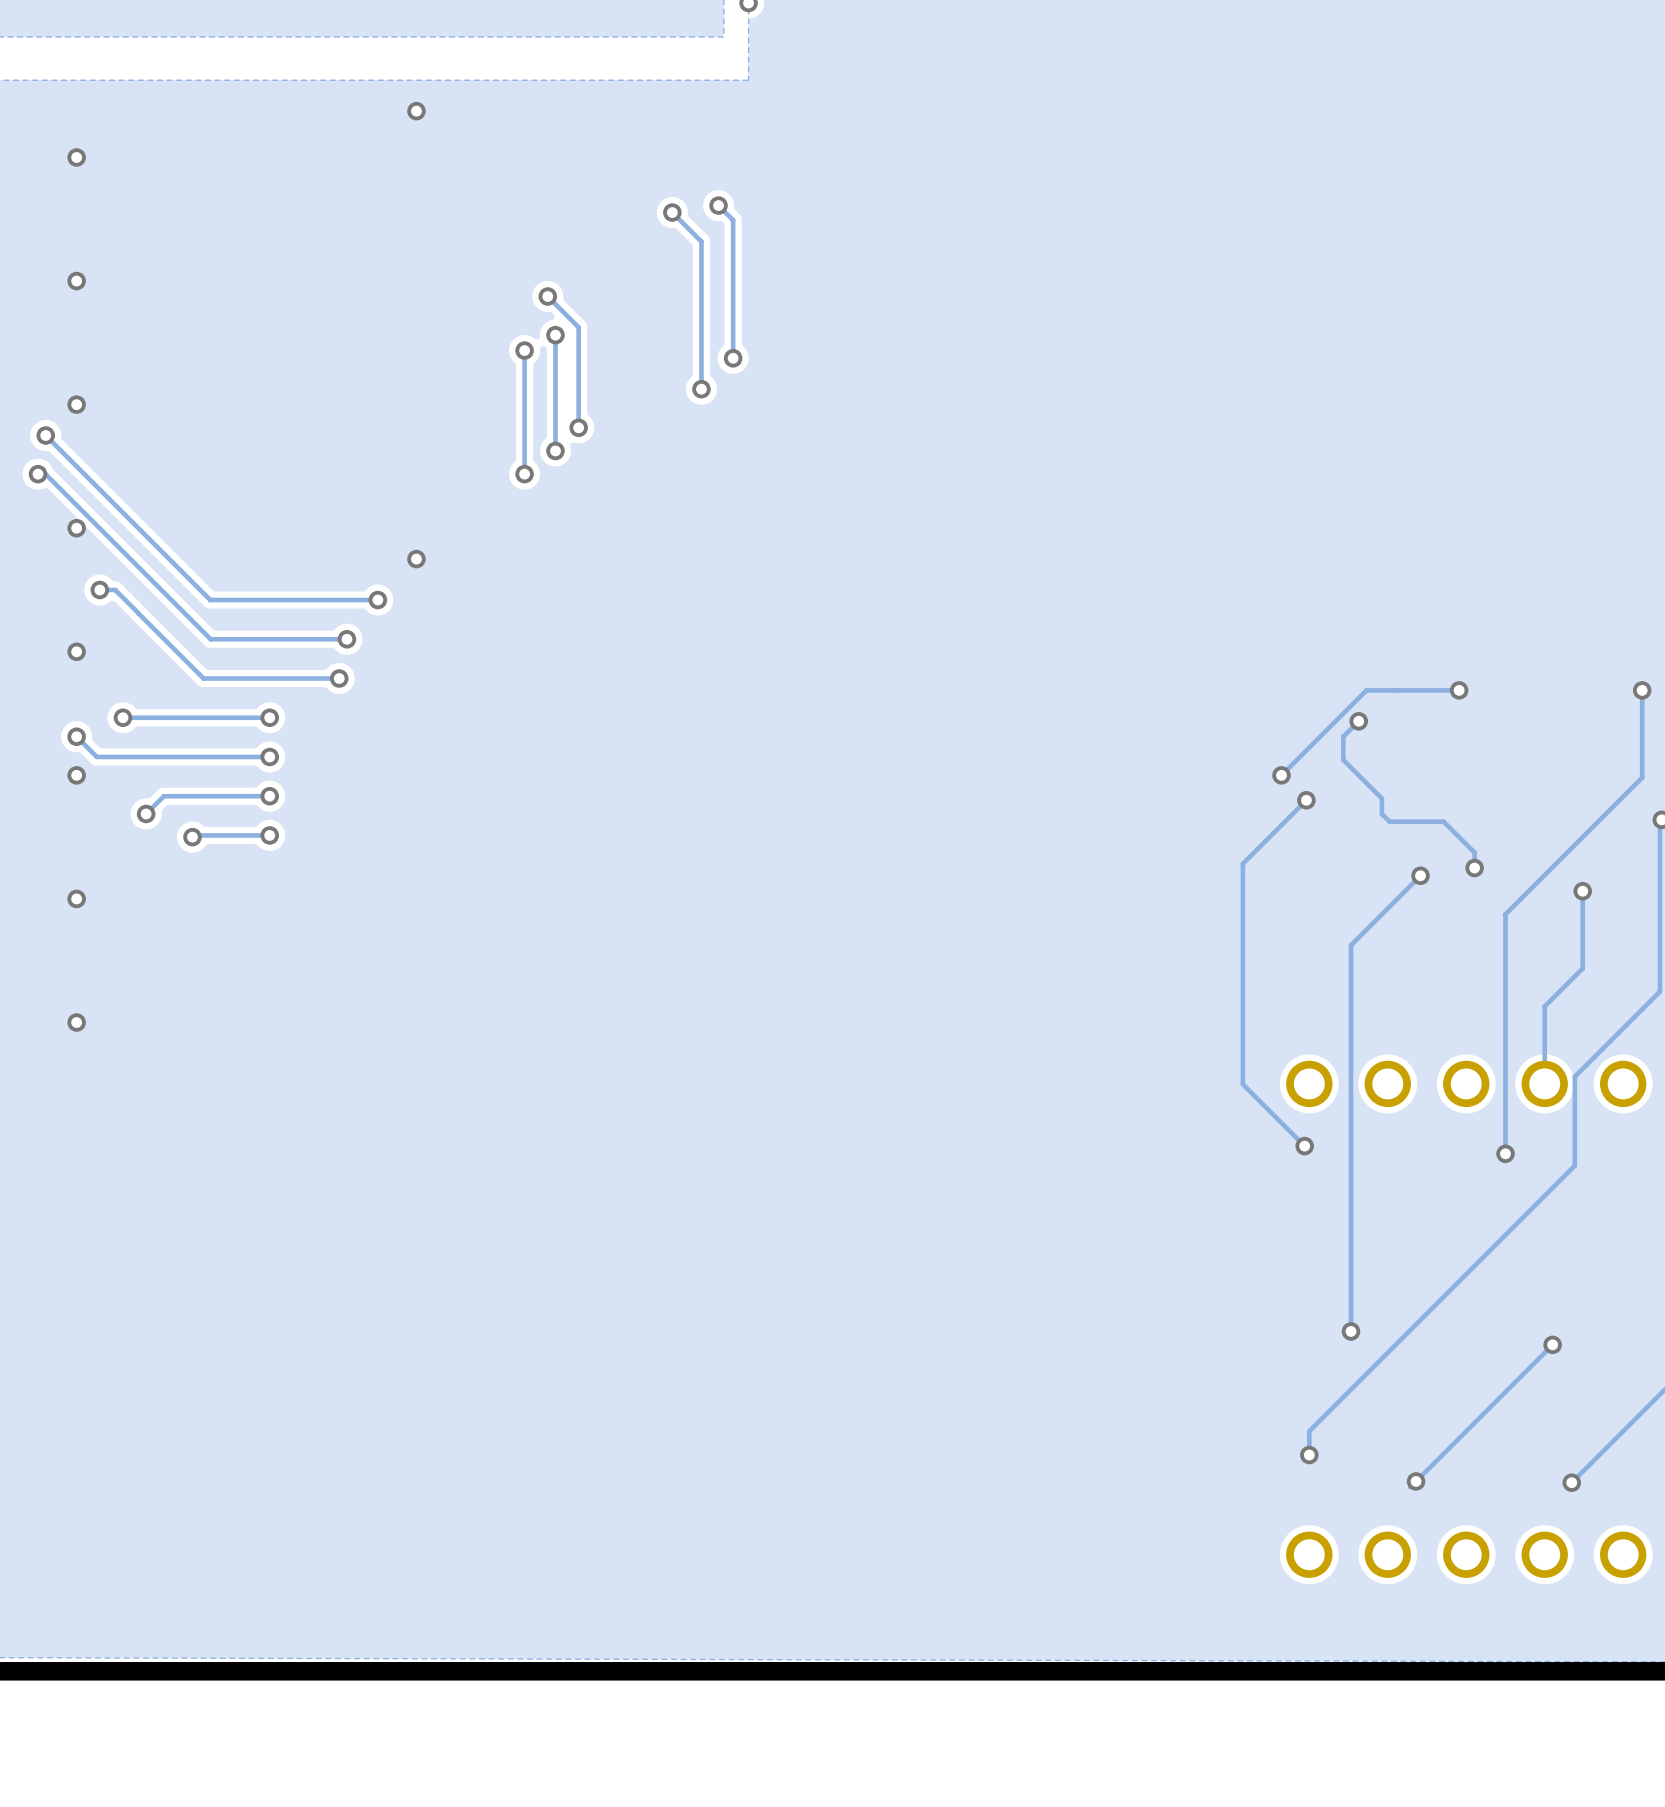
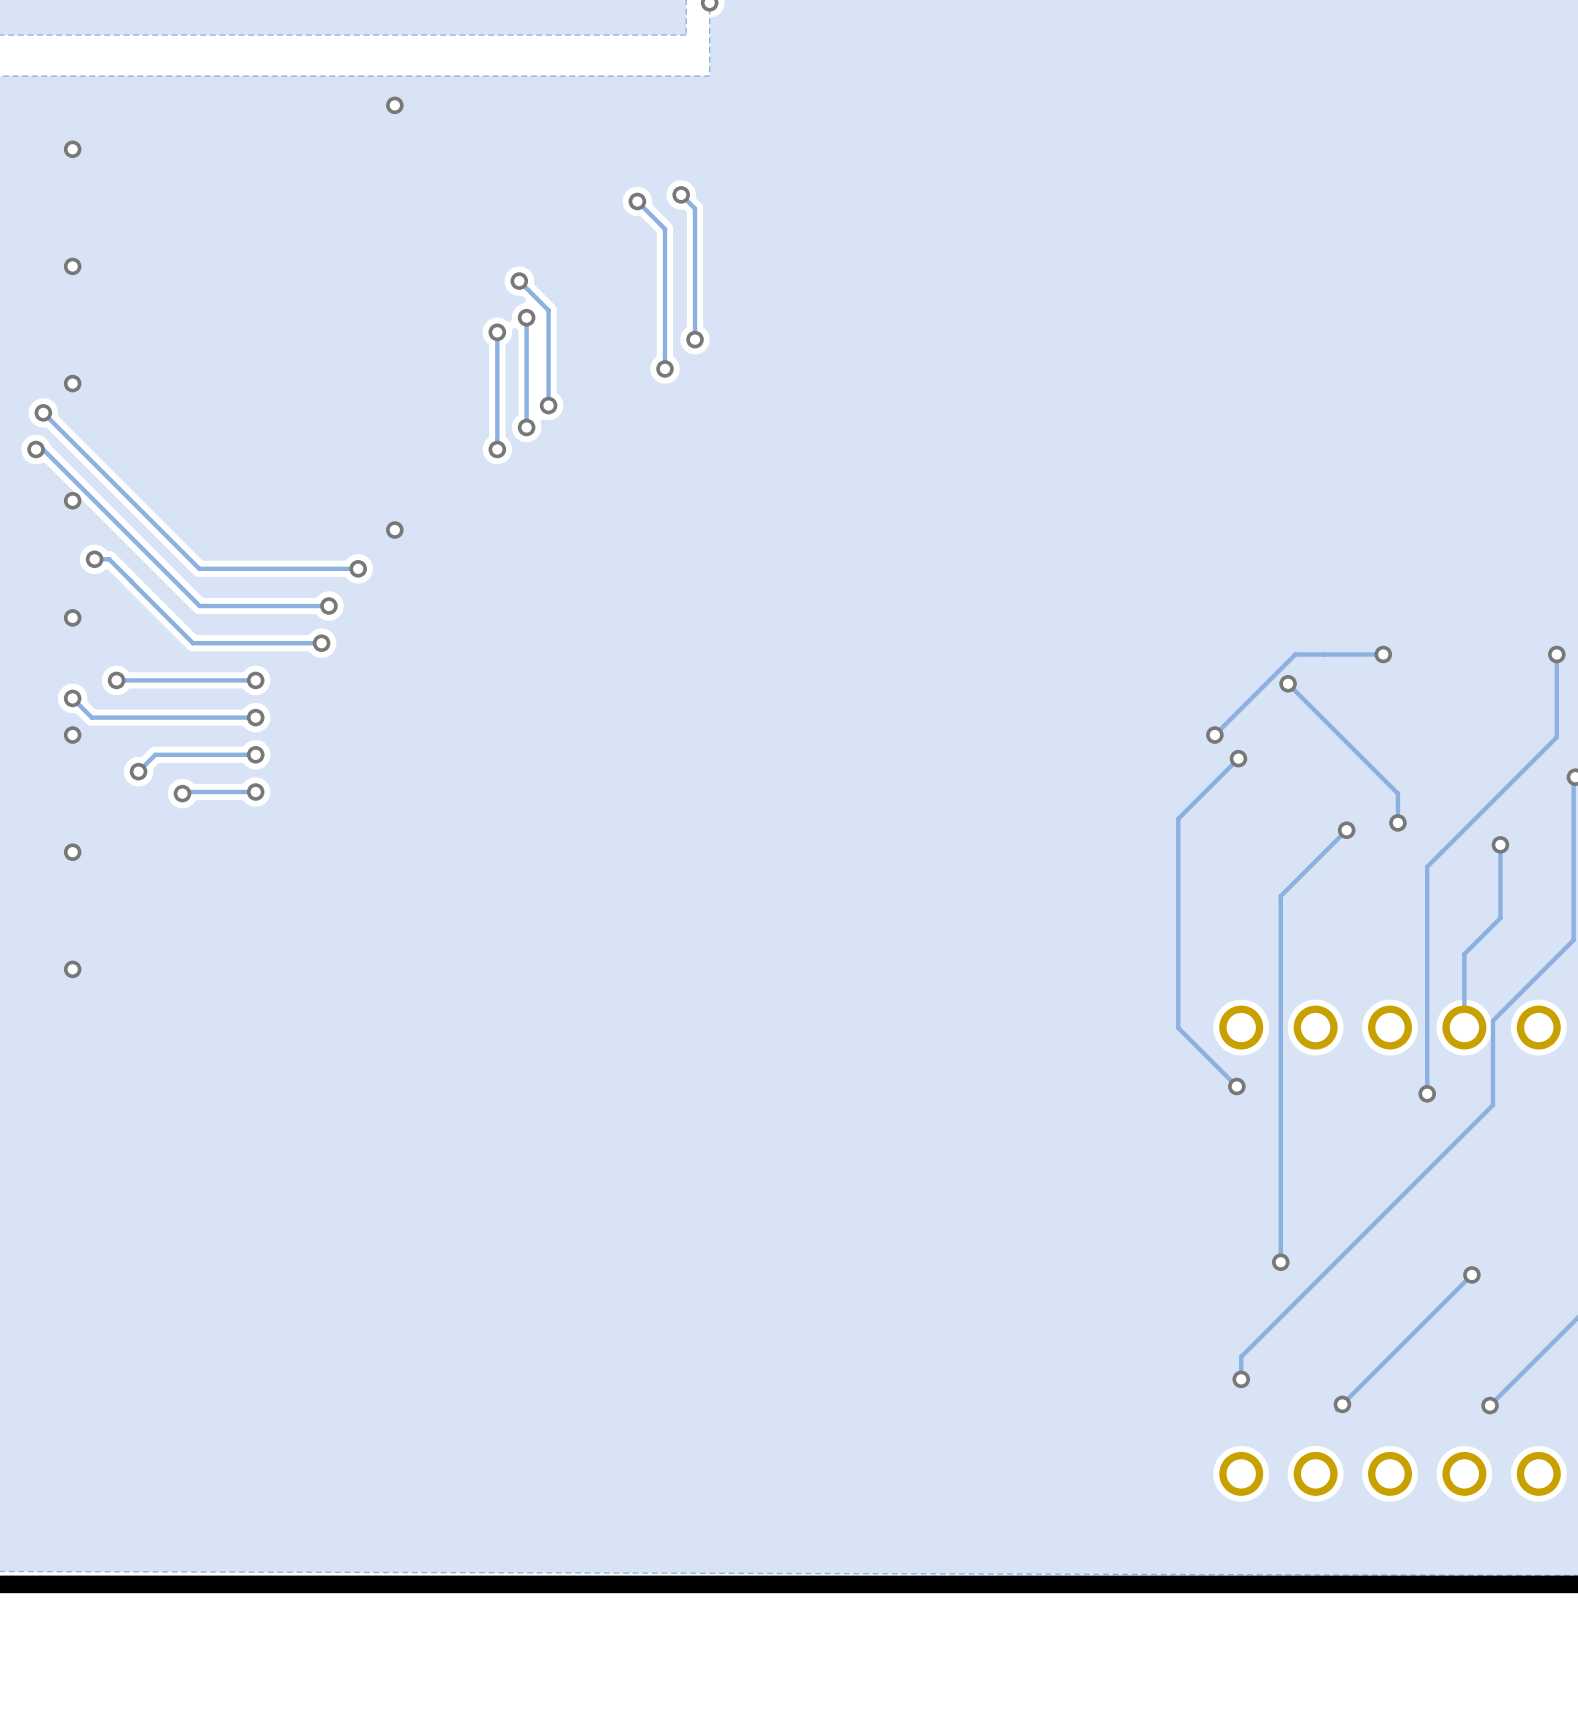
track: (1358, 721) (1343, 736) (1343, 759) (1381, 798) (1381, 813) (1389, 821) (1443, 821) (1474, 852) -> (1288, 683) (1397, 793) (1397, 808)

